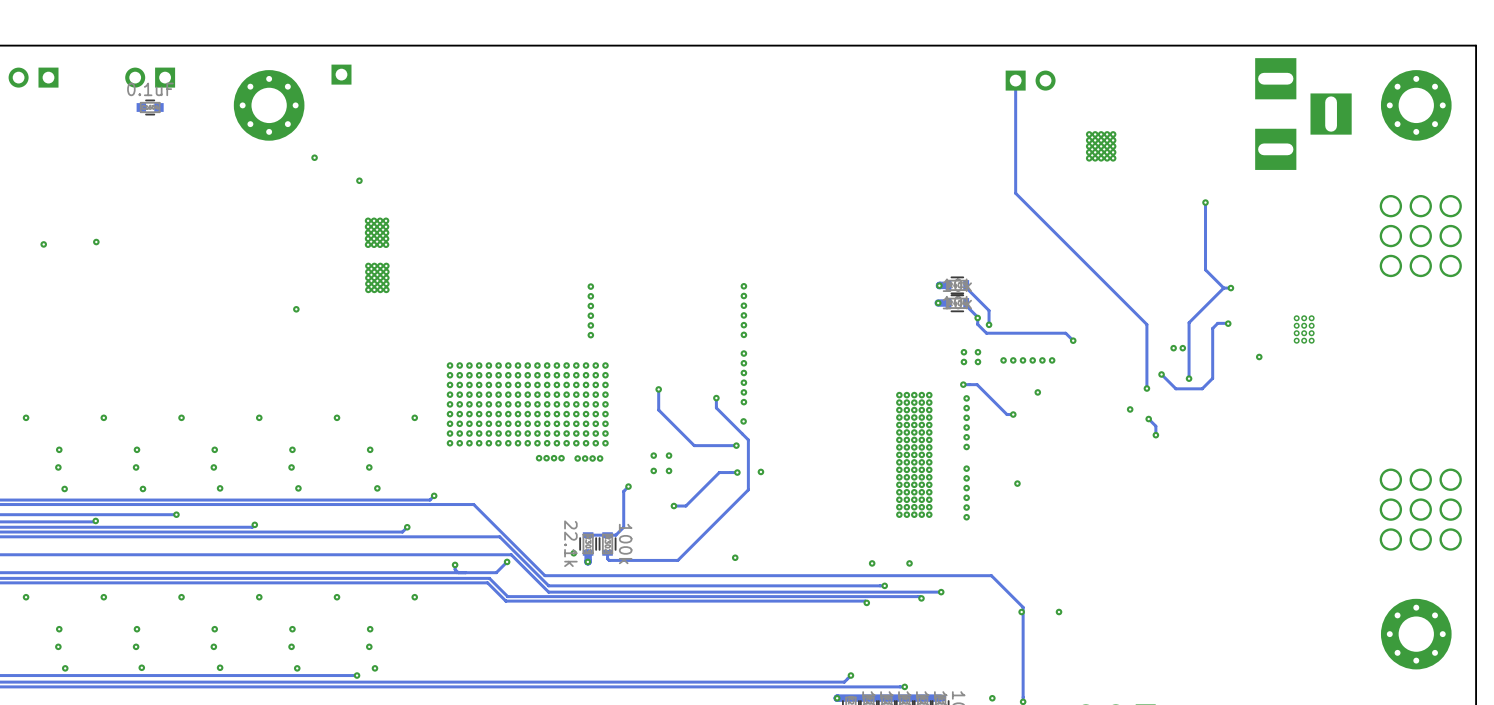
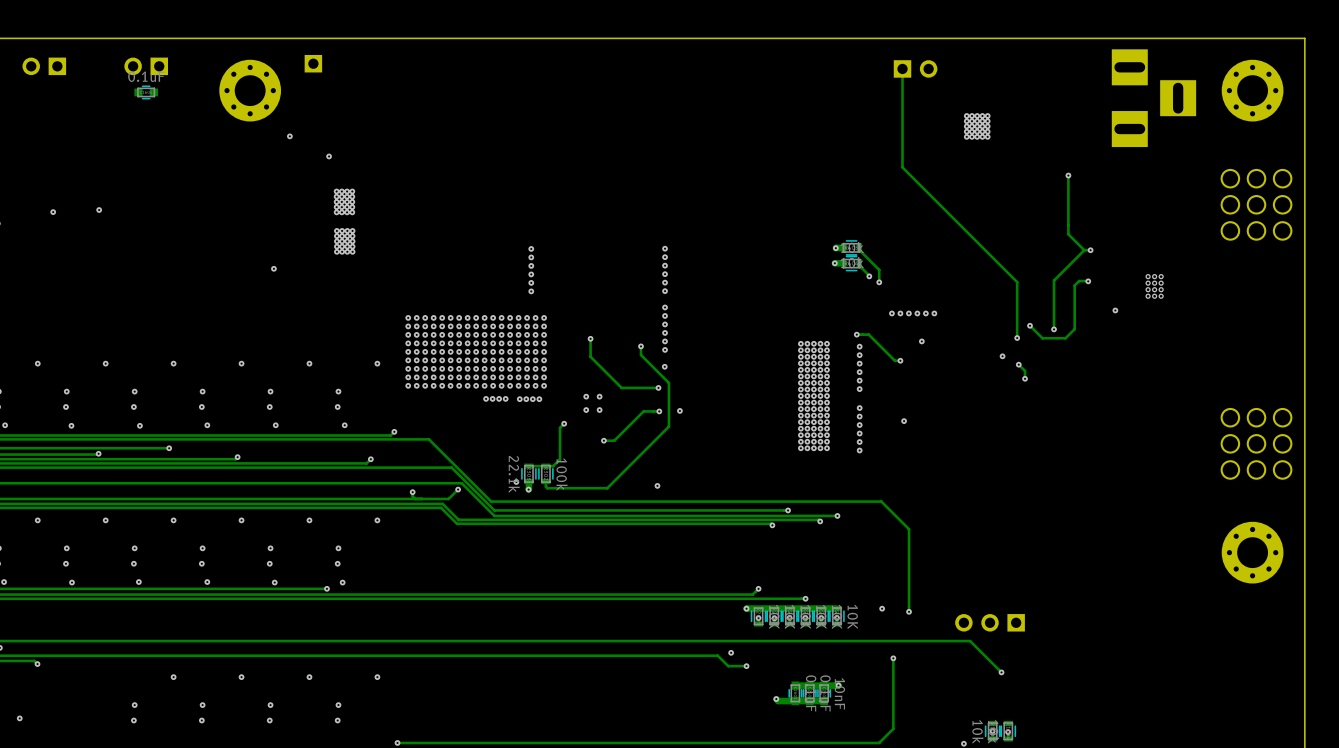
track: (977, 317) (977, 324) (986, 333) (1065, 333) (1073, 340) -> none
via: (1073, 340) -> none
via: (1173, 348) -> none
via: (1182, 348) -> none
via: (963, 352) -> none
via: (977, 352) -> none
via: (963, 361) -> none
via: (977, 361) -> none
via: (872, 563) -> none
via: (909, 563) -> none
via: (1021, 612) -> none
via: (1059, 612) -> none

